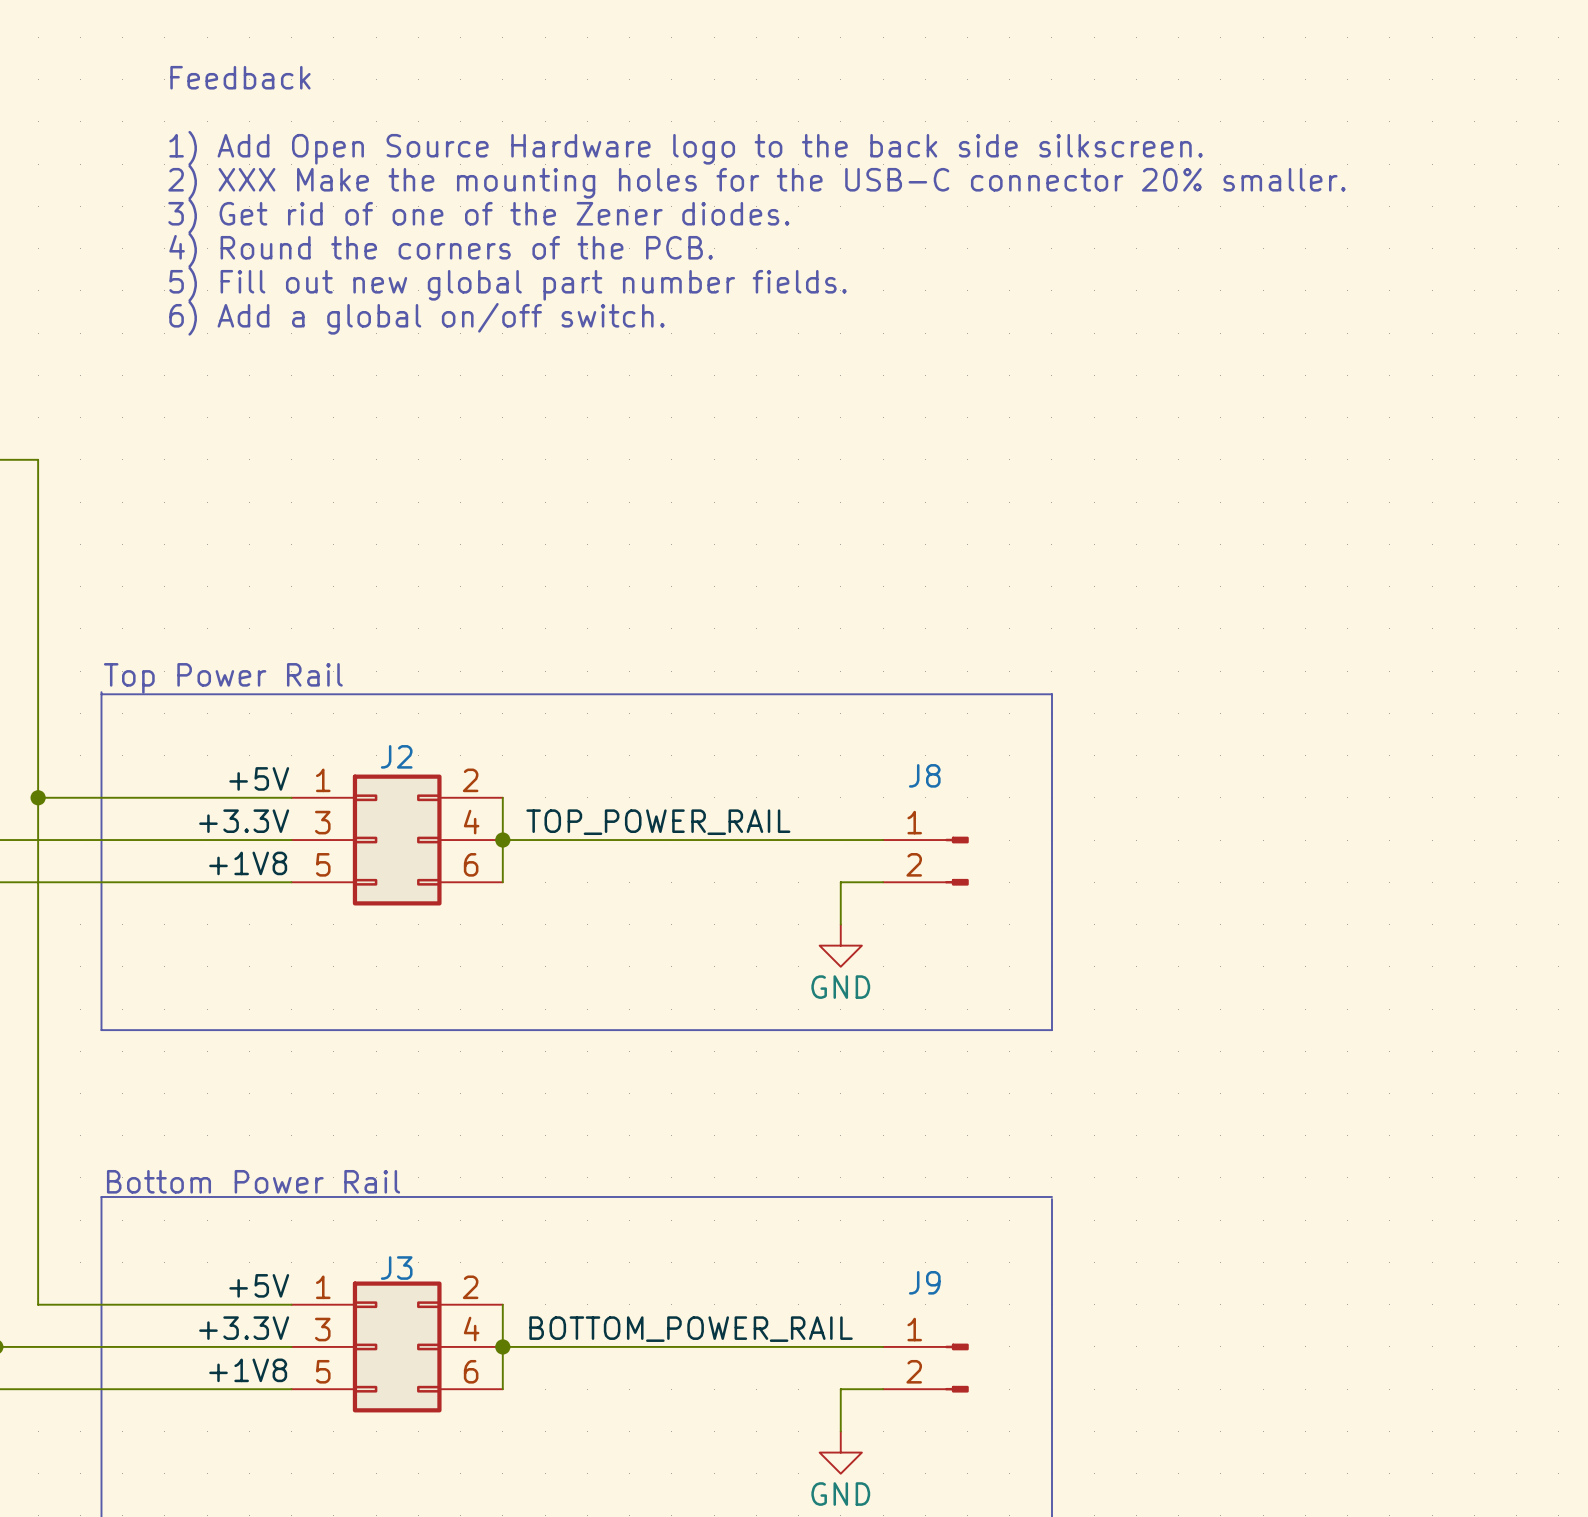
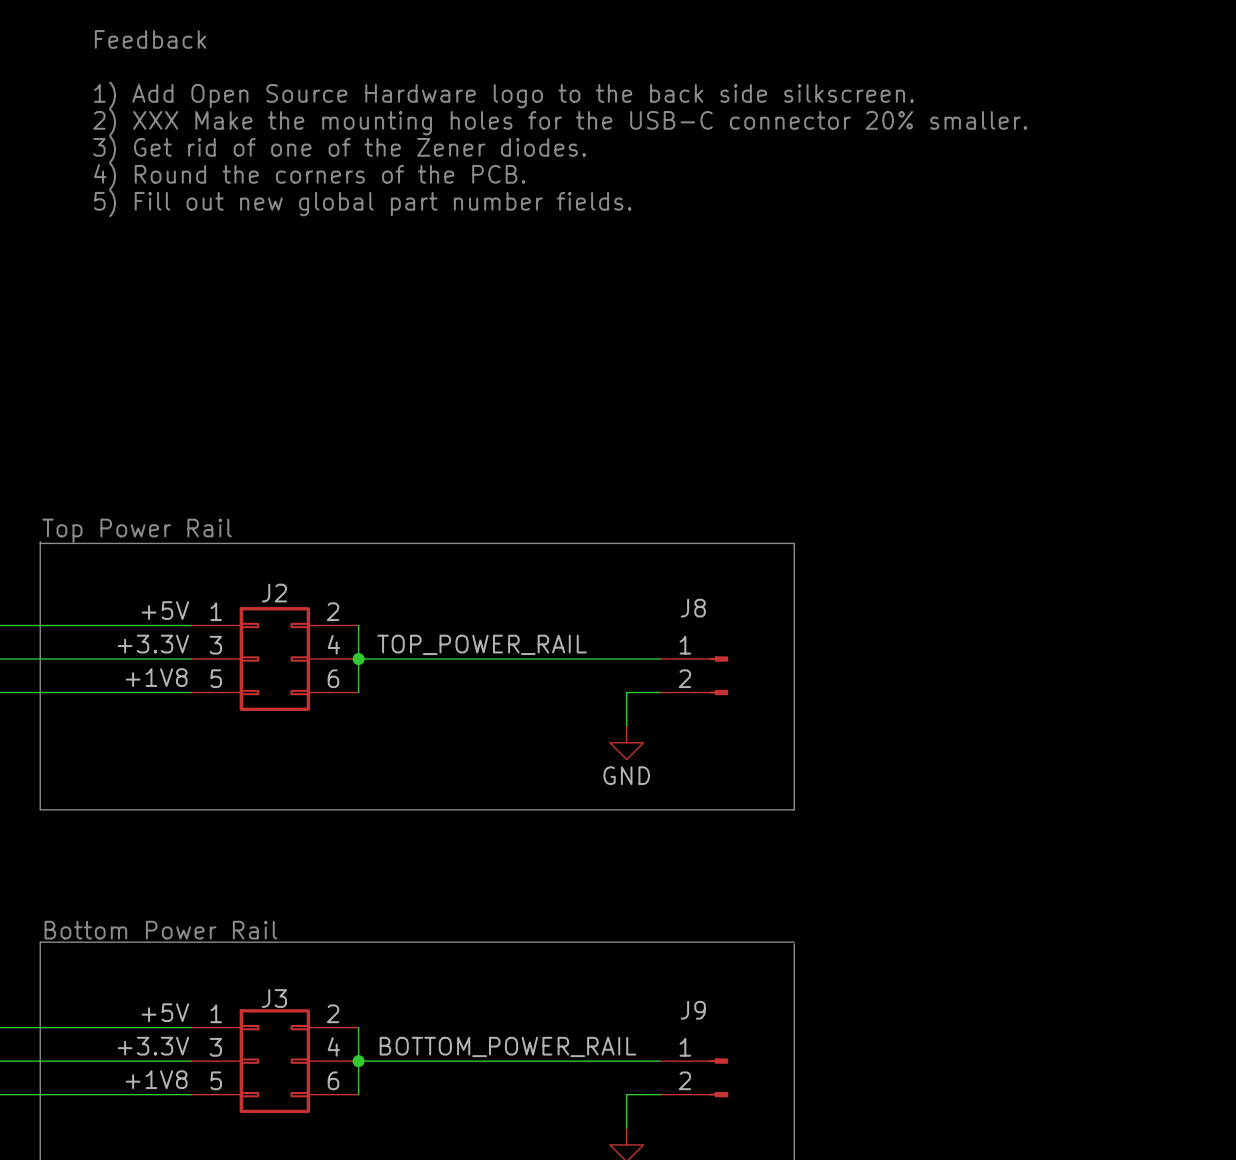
text position: Feedback (240, 77) -> Feedback (150, 39)
text position: 1) Add Open Source Hardware logo to the back side silkscreen. (686, 148) -> 1) Add Open Source Hardware logo to the back side silkscreen. (503, 95)
text position: 2) XXX Make the mounting holes for the USB-C connector 20% smaller. (756, 182) -> 2) XXX Make the mounting holes for the USB-C connector 20% smaller. (560, 122)
text position: 3) Get rid of one of the Zener diodes. (478, 216) -> 3) Get rid of one of the Zener diodes. (339, 149)
text position: 4) Round the corners of the PCB. (441, 250) -> 4) Round the corners of the PCB. (309, 176)
text position: 5) Fill out new global part number fields. (508, 284) -> 5) Fill out new global part number fields. (362, 203)
text: 6) Add a global on/off switch. (416, 318) -> none

